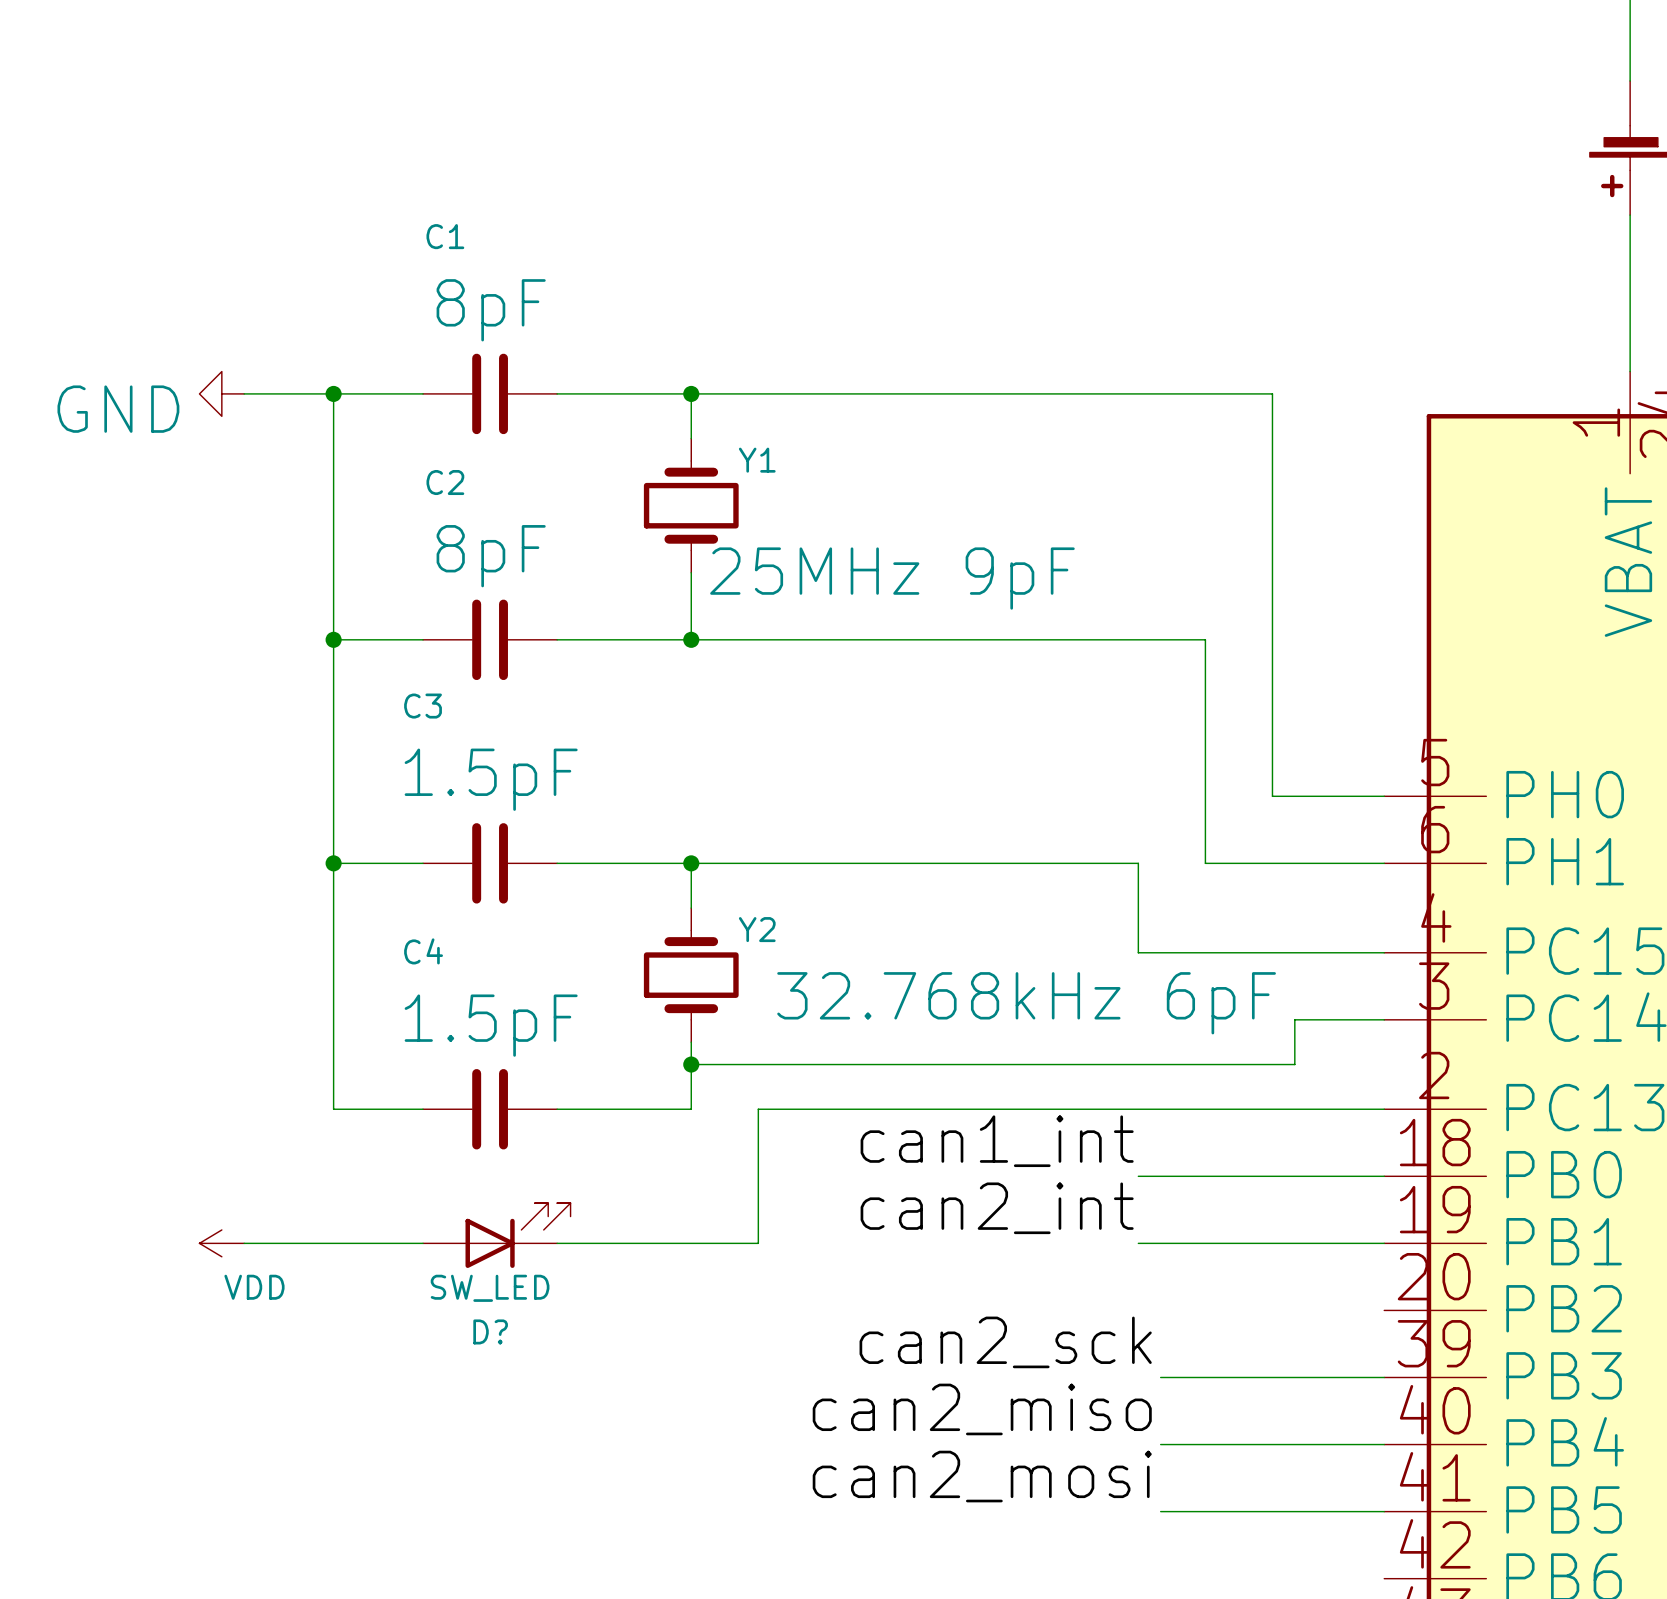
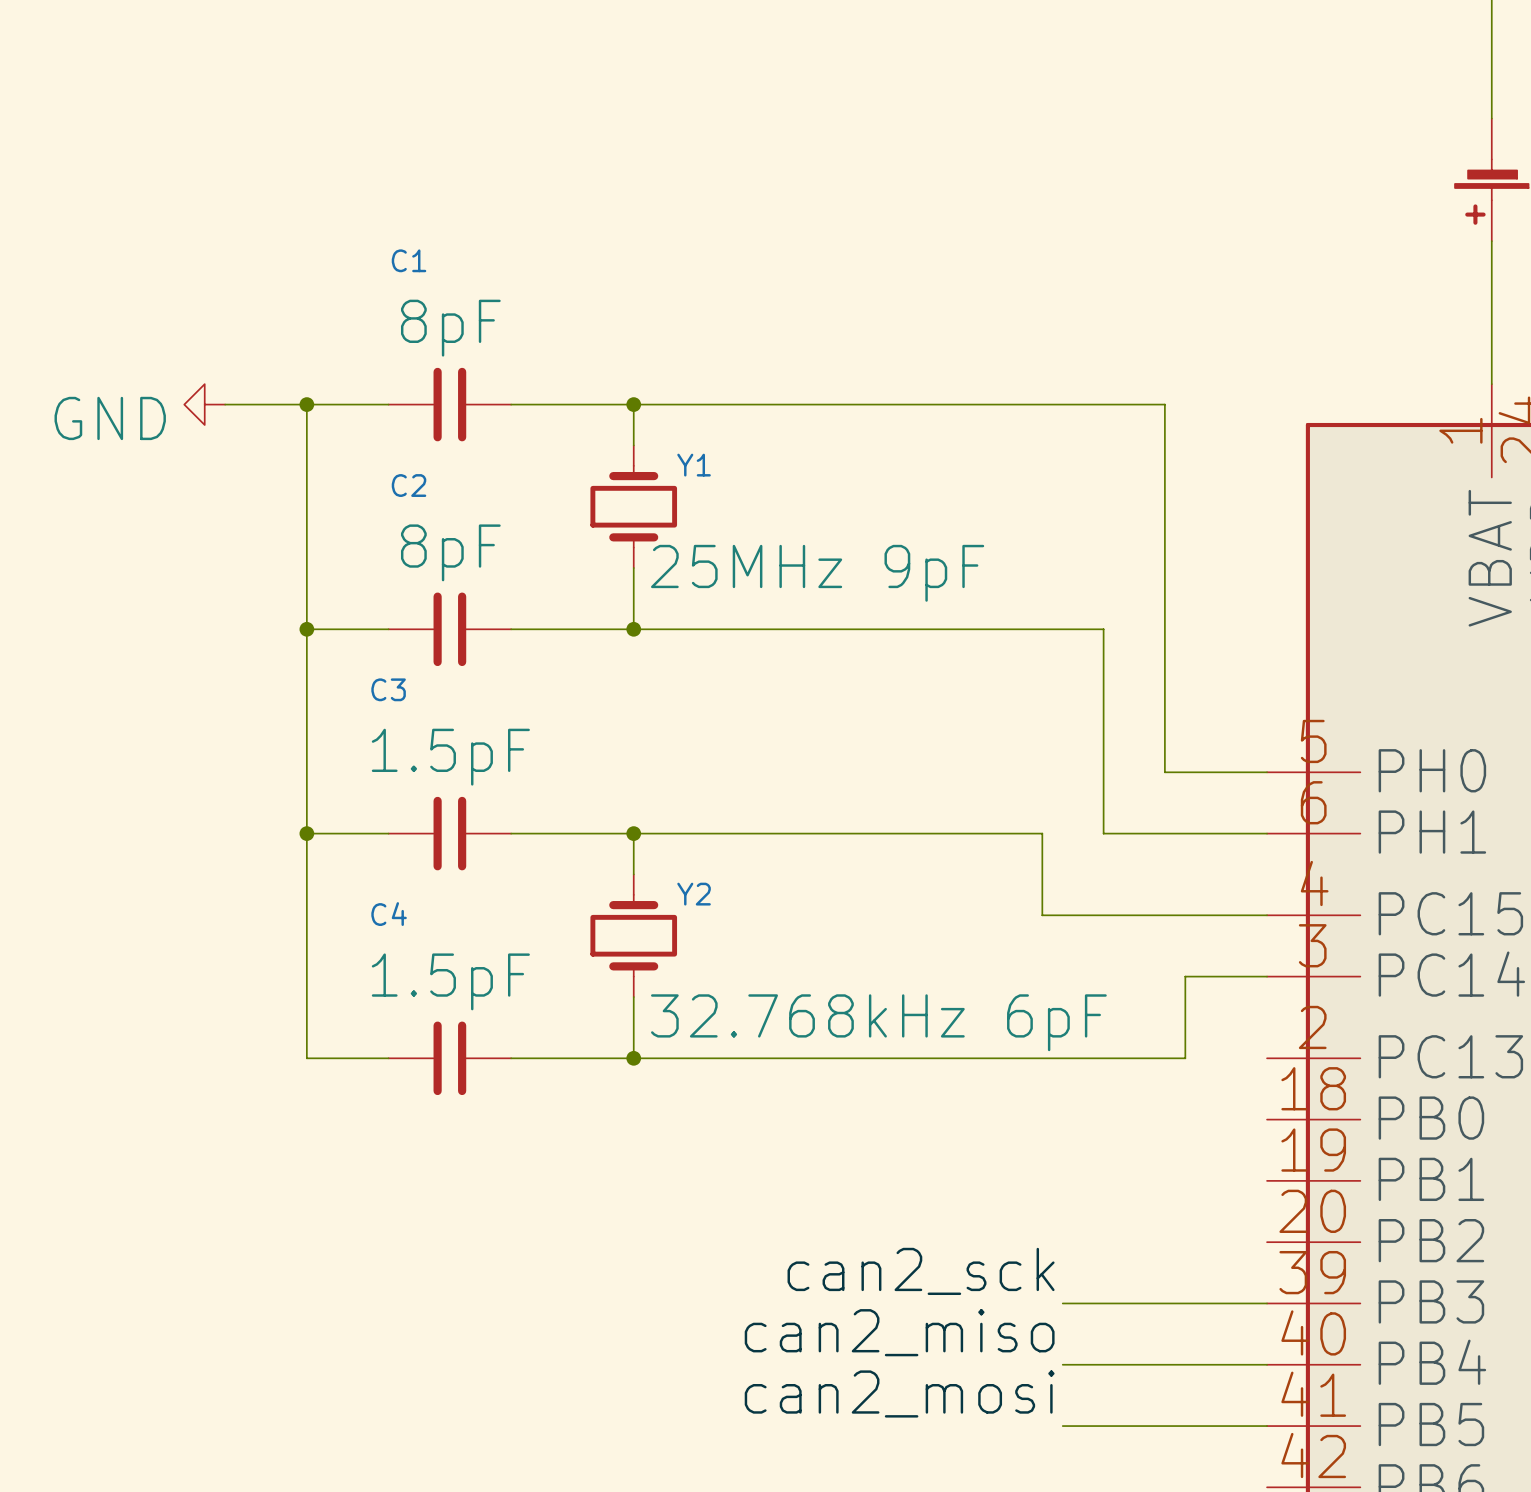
Y2 value position: 32.768kHz 6pF (1026, 1003) -> 32.768kHz 6pF (878, 1022)
wire: (691, 1064) (1294, 1064) -> none
junction position: (691, 1064) -> (633, 1058)
wire: (758, 1109) (758, 1243) (557, 1243) -> (695, 1058) (633, 1058)
wire: (1294, 1109) (1384, 1109) -> (1185, 1058) (1185, 1017)
label: can1_int (997, 1141) -> none
wire: (1138, 1176) (1384, 1176) -> none
label: can2_int (997, 1208) -> none
D?: SW_LED (496, 1235) -> none
power symbol: VDD (221, 1243) -> none
wire: (244, 1243) (423, 1243) -> none
wire: (1138, 1243) (1384, 1243) -> none

